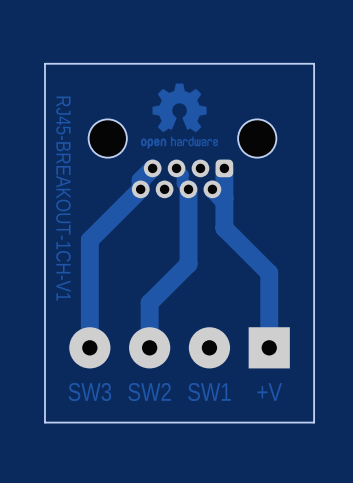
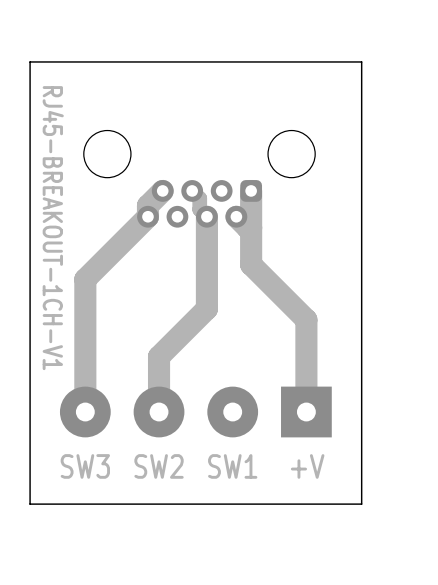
drawing: [141, 83, 219, 149] -> none

